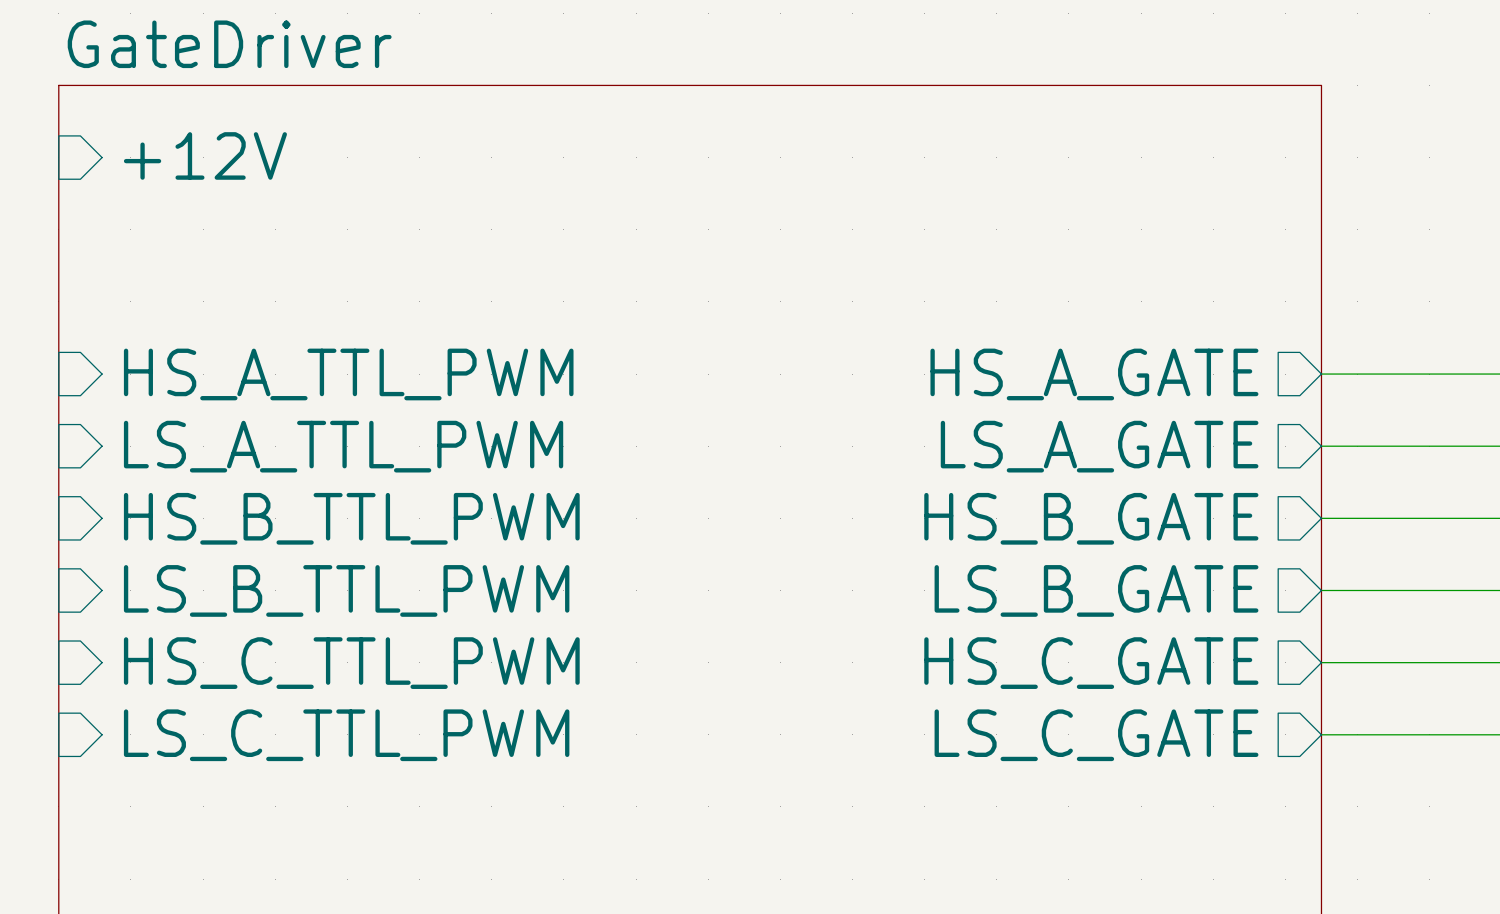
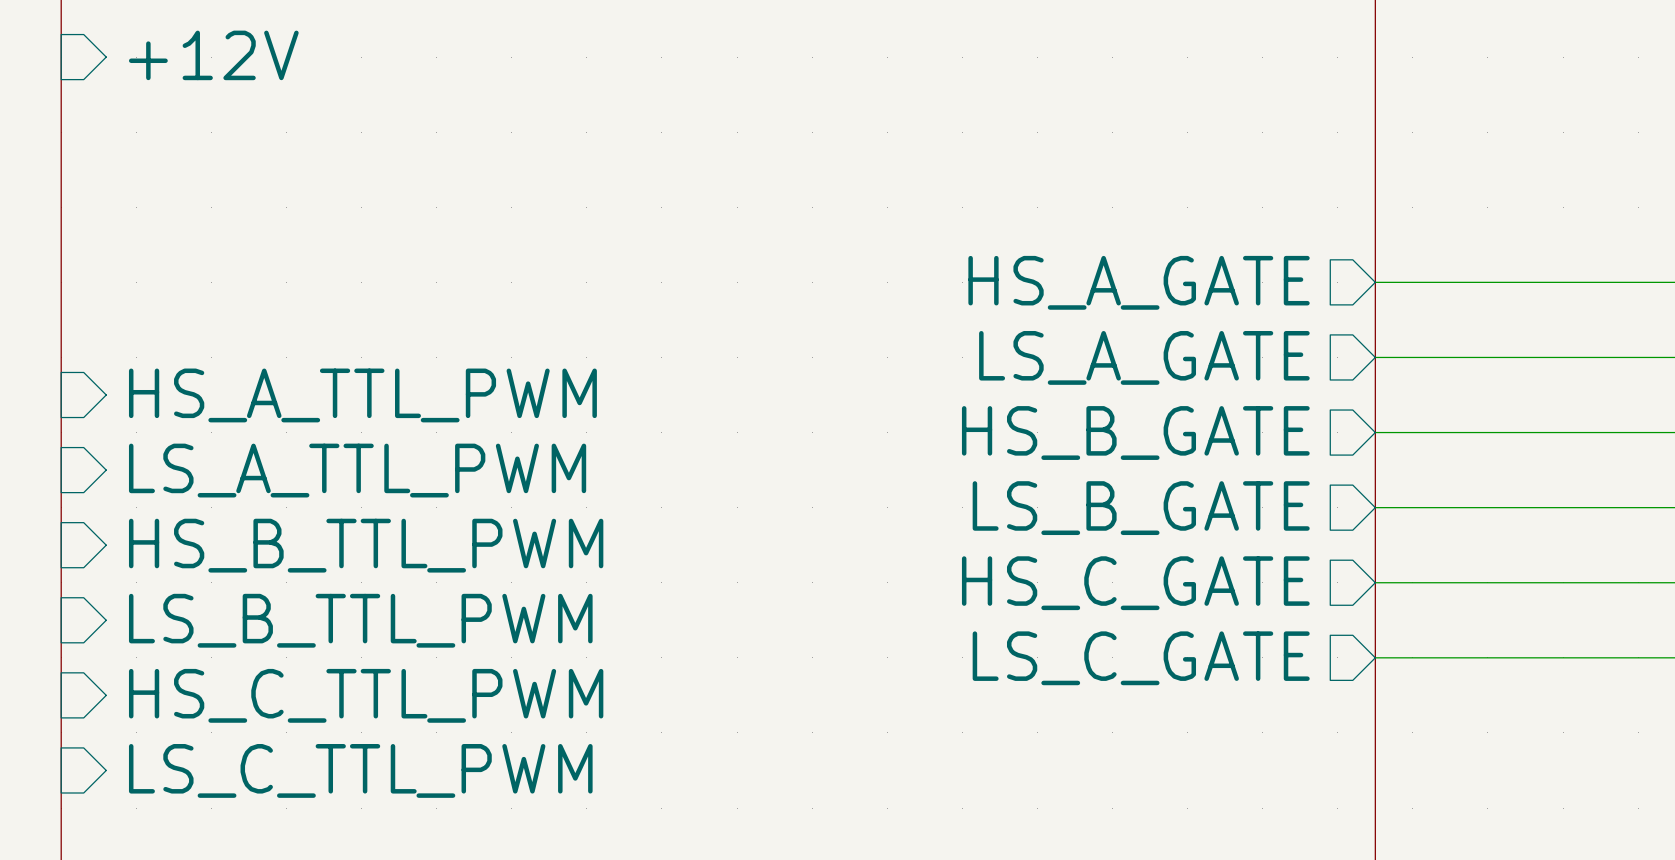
sheet pin position: HS_A_TTL_PWM (348, 374) -> HS_A_TTL_PWM (362, 395)
sheet pin position: LS_A_TTL_PWM (343, 446) -> LS_A_TTL_PWM (357, 470)
sheet pin position: HS_B_TTL_PWM (351, 518) -> HS_B_TTL_PWM (366, 545)
sheet pin position: LS_B_TTL_PWM (346, 590) -> LS_B_TTL_PWM (360, 620)
sheet pin position: HS_C_TTL_PWM (351, 663) -> HS_C_TTL_PWM (366, 695)
sheet pin position: LS_C_TTL_PWM (346, 735) -> LS_C_TTL_PWM (360, 770)

